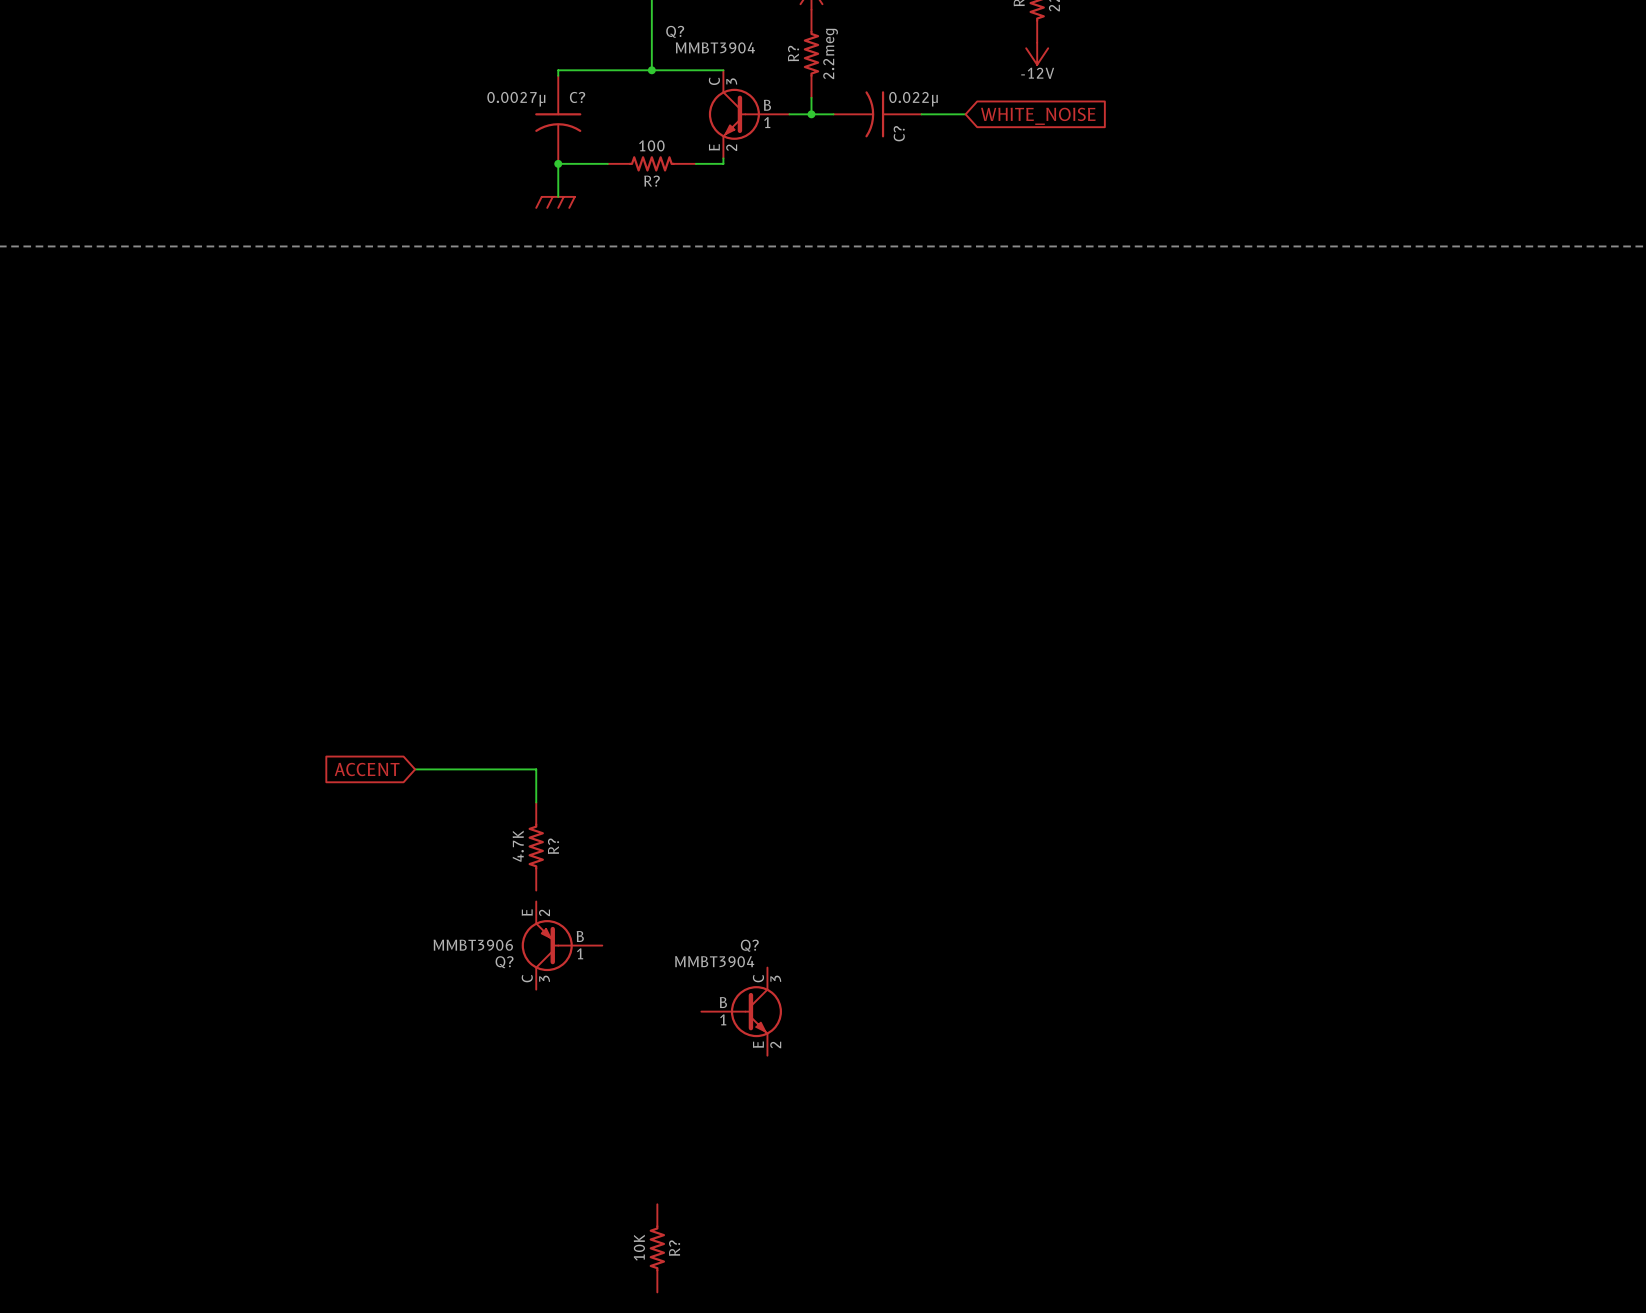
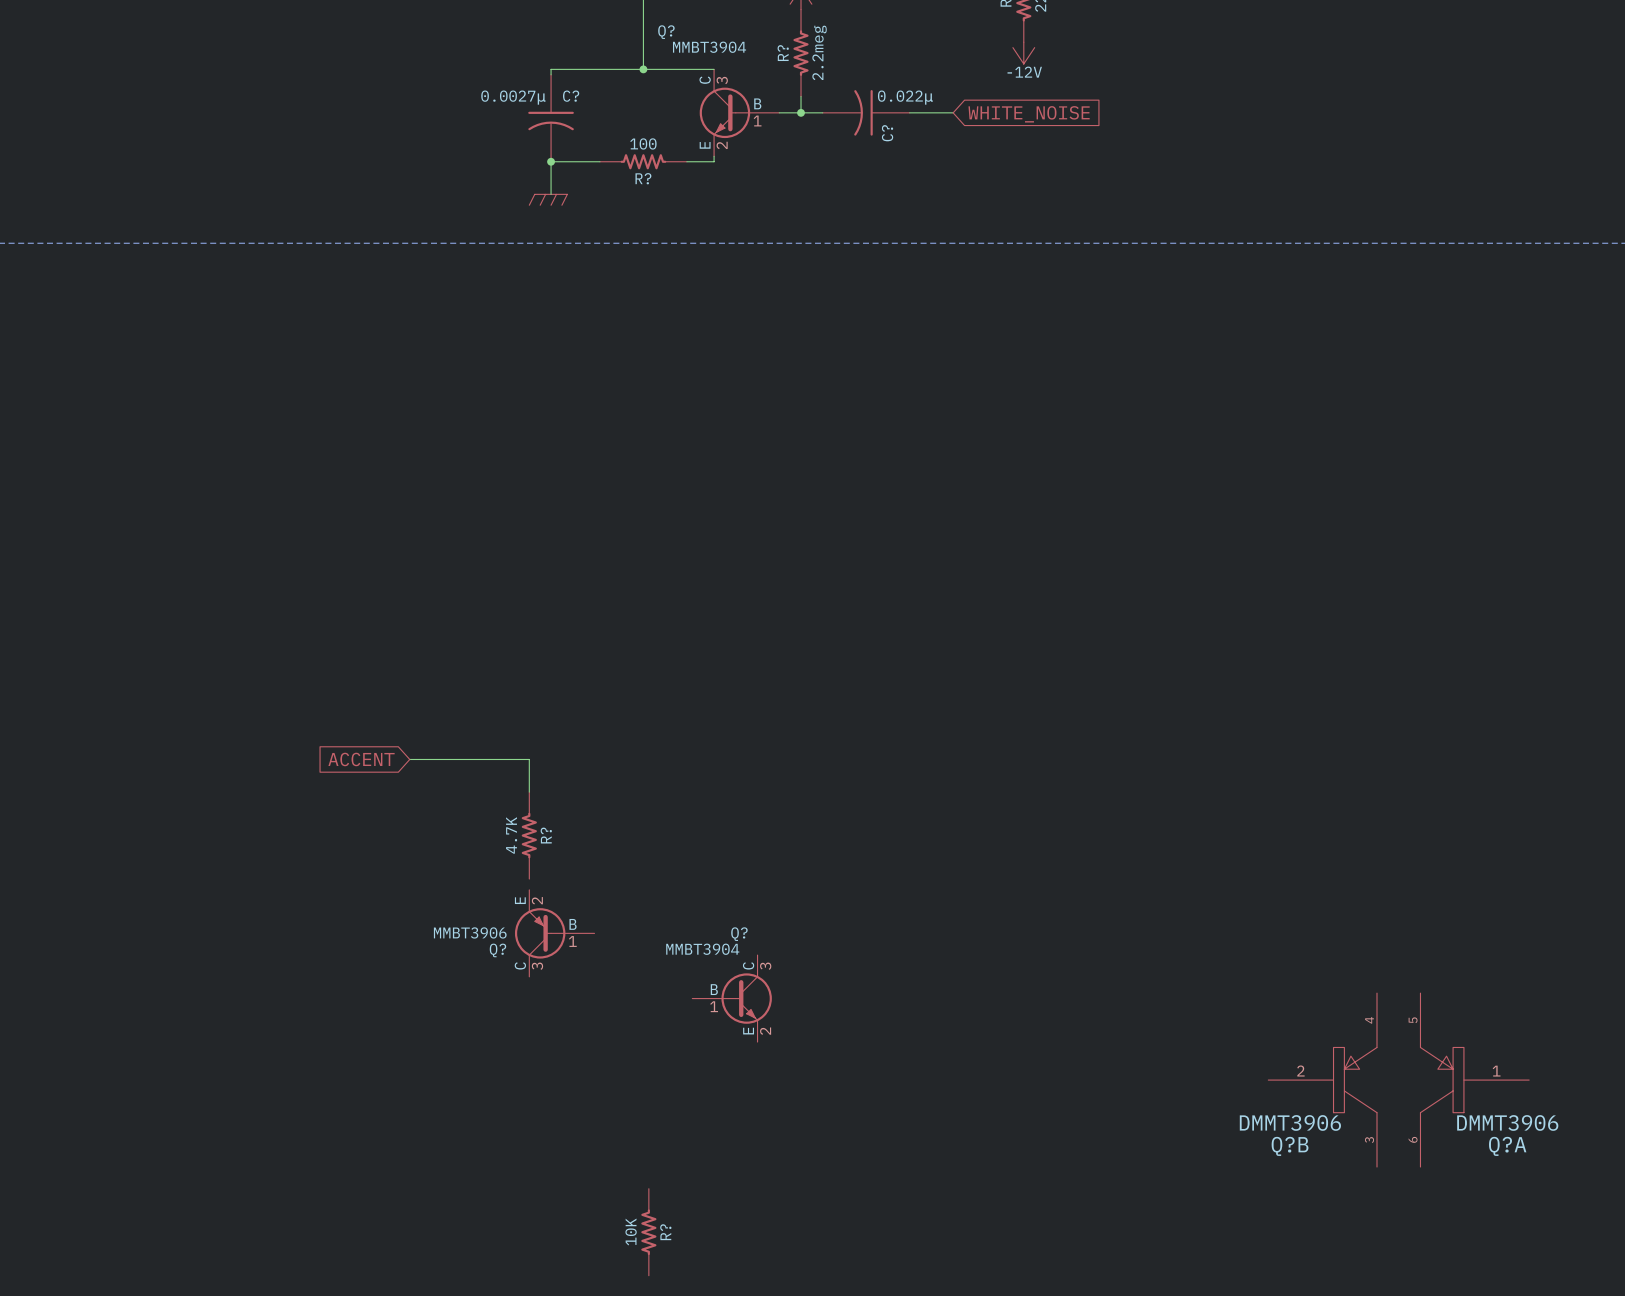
Q?B: none -> DMMT3906 (1322, 1080)
Q?A: none -> DMMT3906 (1474, 1080)

